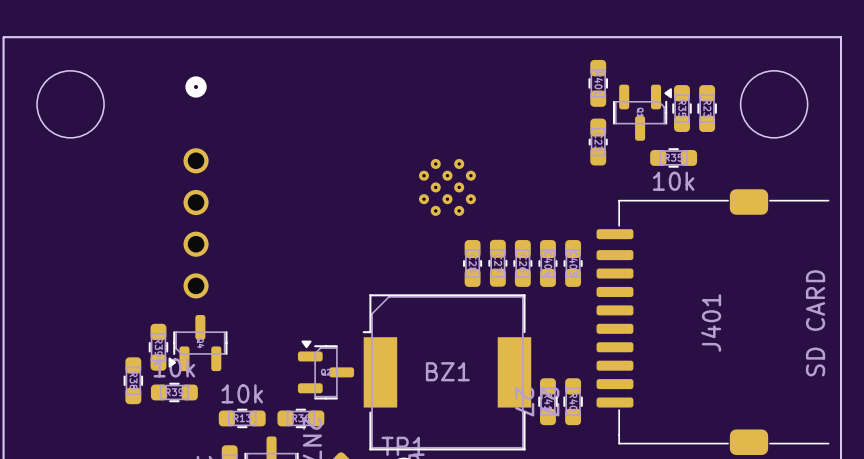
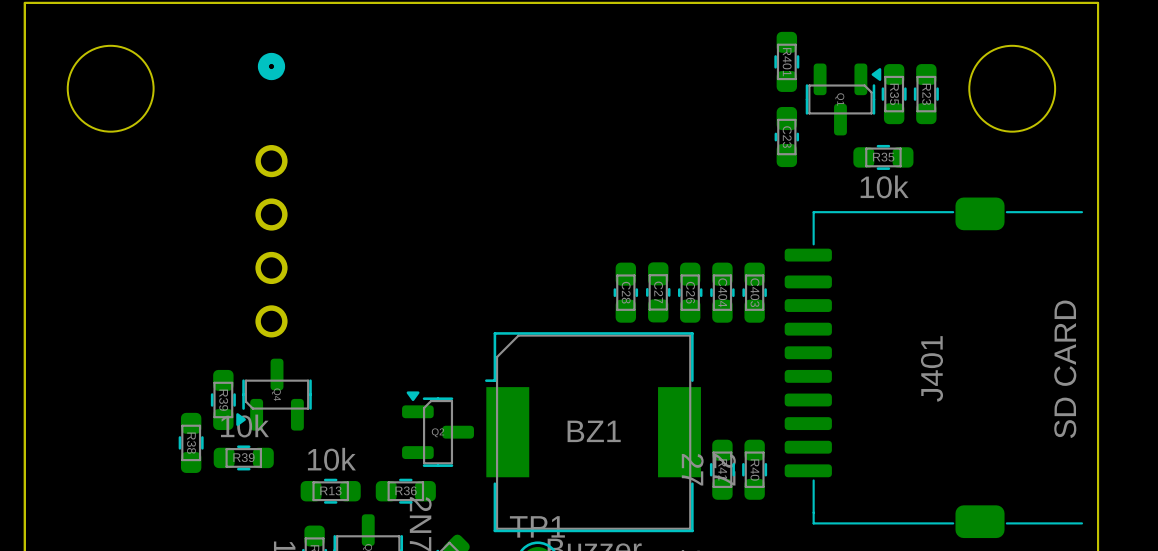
part: (447, 187) -> none

